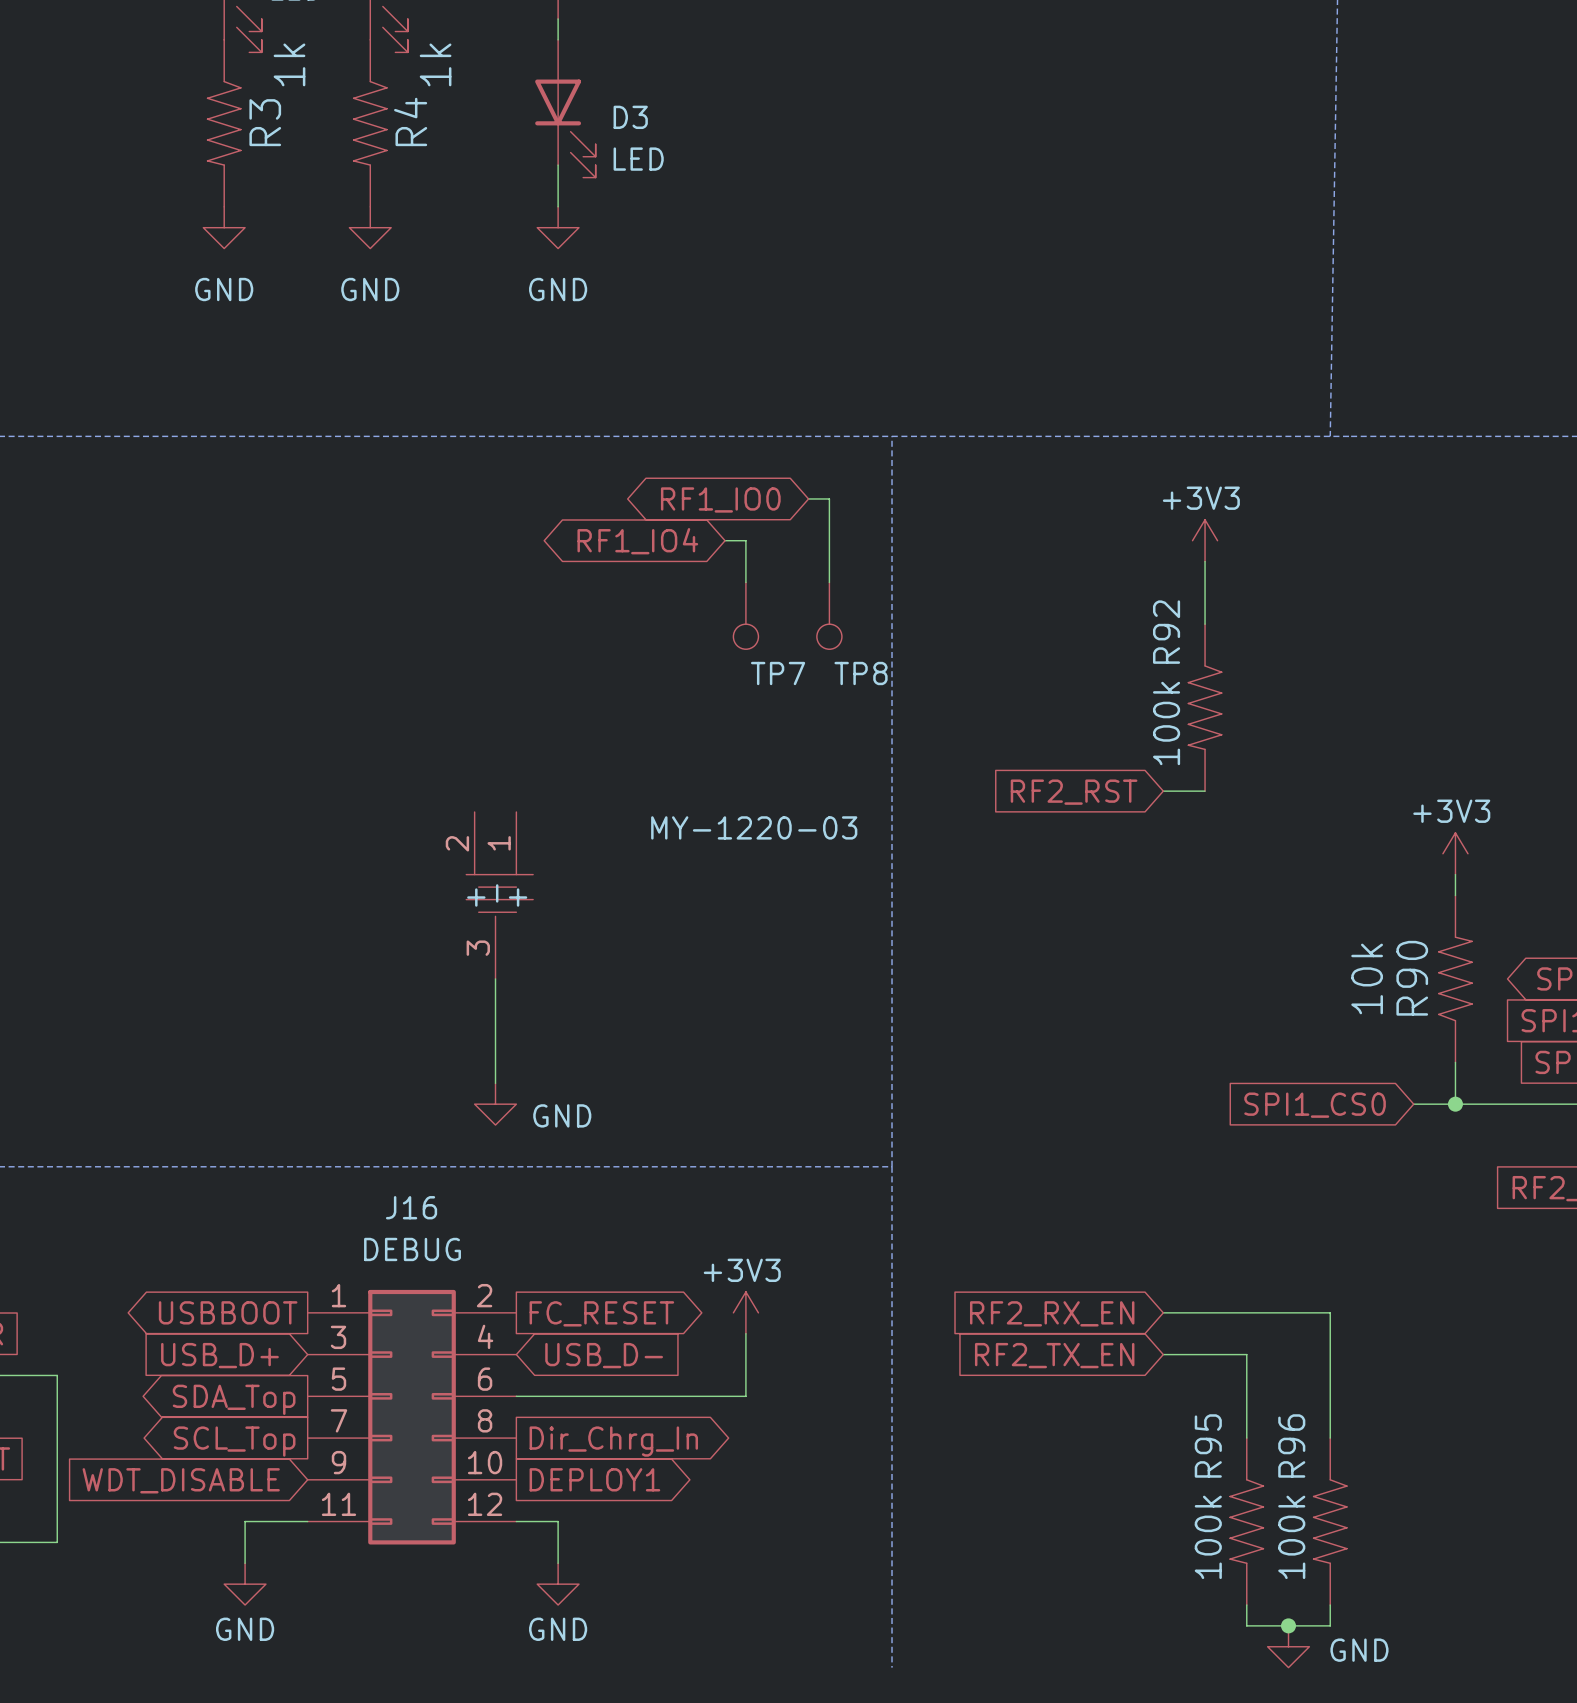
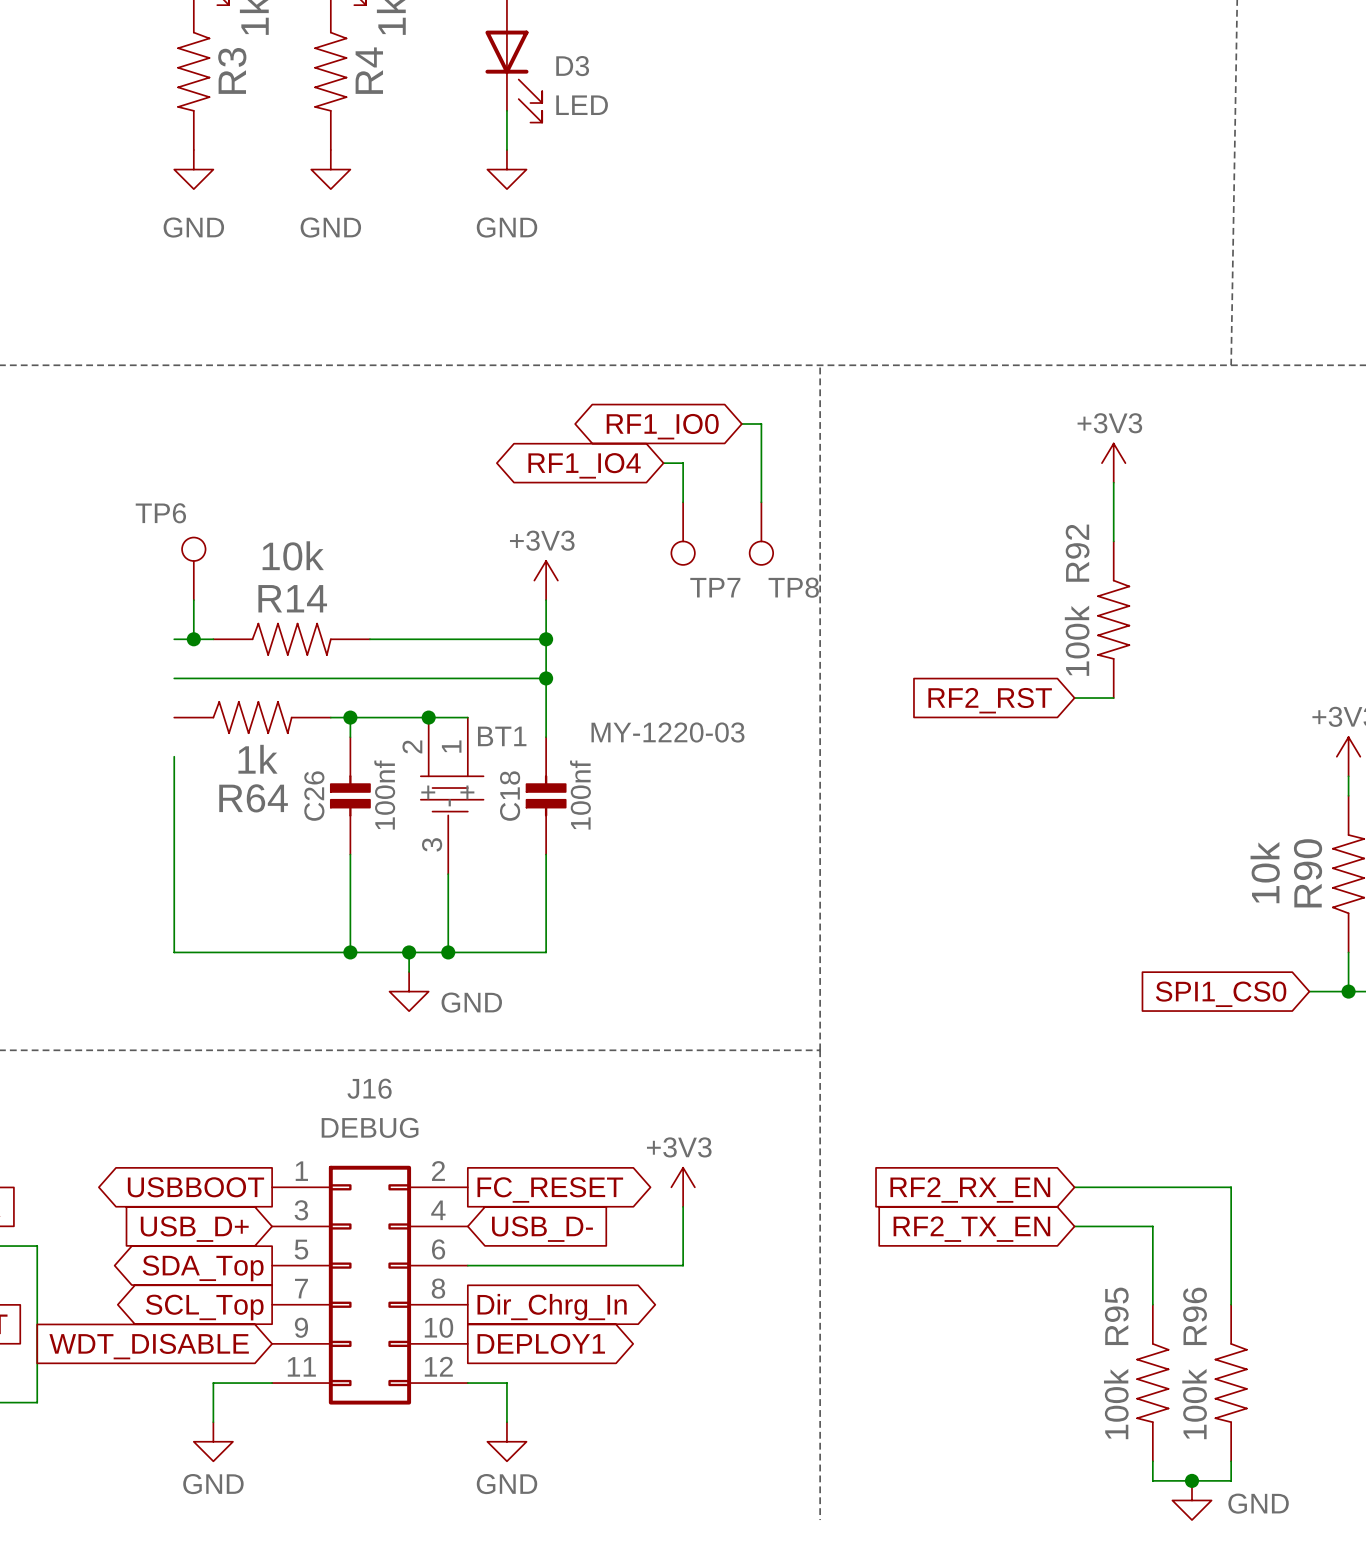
TP6: none -> (193, 568)
power symbol: none -> +3V3 (546, 580)
wire: none -> (193, 600) (193, 639)
wire: none -> (546, 600) (546, 737)
wire: none -> (174, 639) (213, 639)
junction: none -> (193, 639)
R14: none -> 10k (291, 639)
wire: none -> (369, 639) (546, 639)
junction: none -> (546, 639)
wire: none -> (174, 678) (546, 678)
junction: none -> (546, 678)
R64: none -> 1k (252, 717)
wire: none -> (330, 717) (467, 717)
wire: none -> (350, 717) (350, 737)
junction: none -> (350, 717)
junction: none -> (428, 717)
BT1 name: none -> BT1 (502, 736)
wire: none -> (174, 756) (174, 952) (546, 952) (546, 854)
C26: none -> 100nf (350, 795)
C18: none -> 100nf (546, 795)
wire: none -> (350, 854) (350, 952)
junction: none -> (350, 952)
junction: none -> (409, 952)
wire: (495, 1062) (495, 1083) -> (409, 952) (409, 972)
junction: none -> (448, 952)
power symbol position: GND (495, 1104) -> GND (409, 991)

